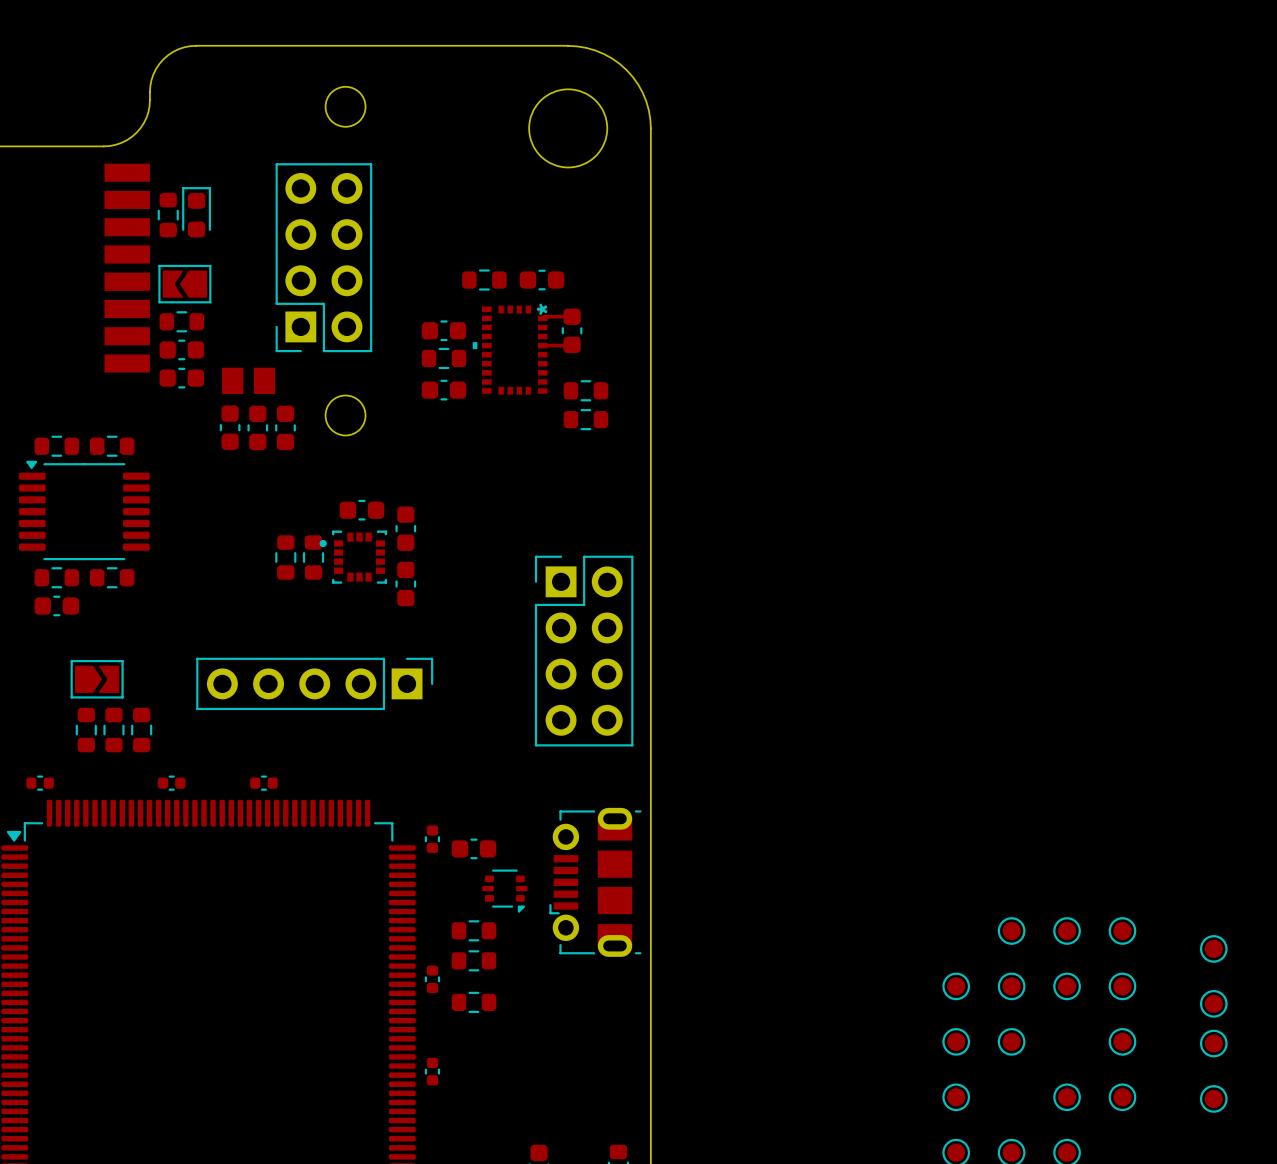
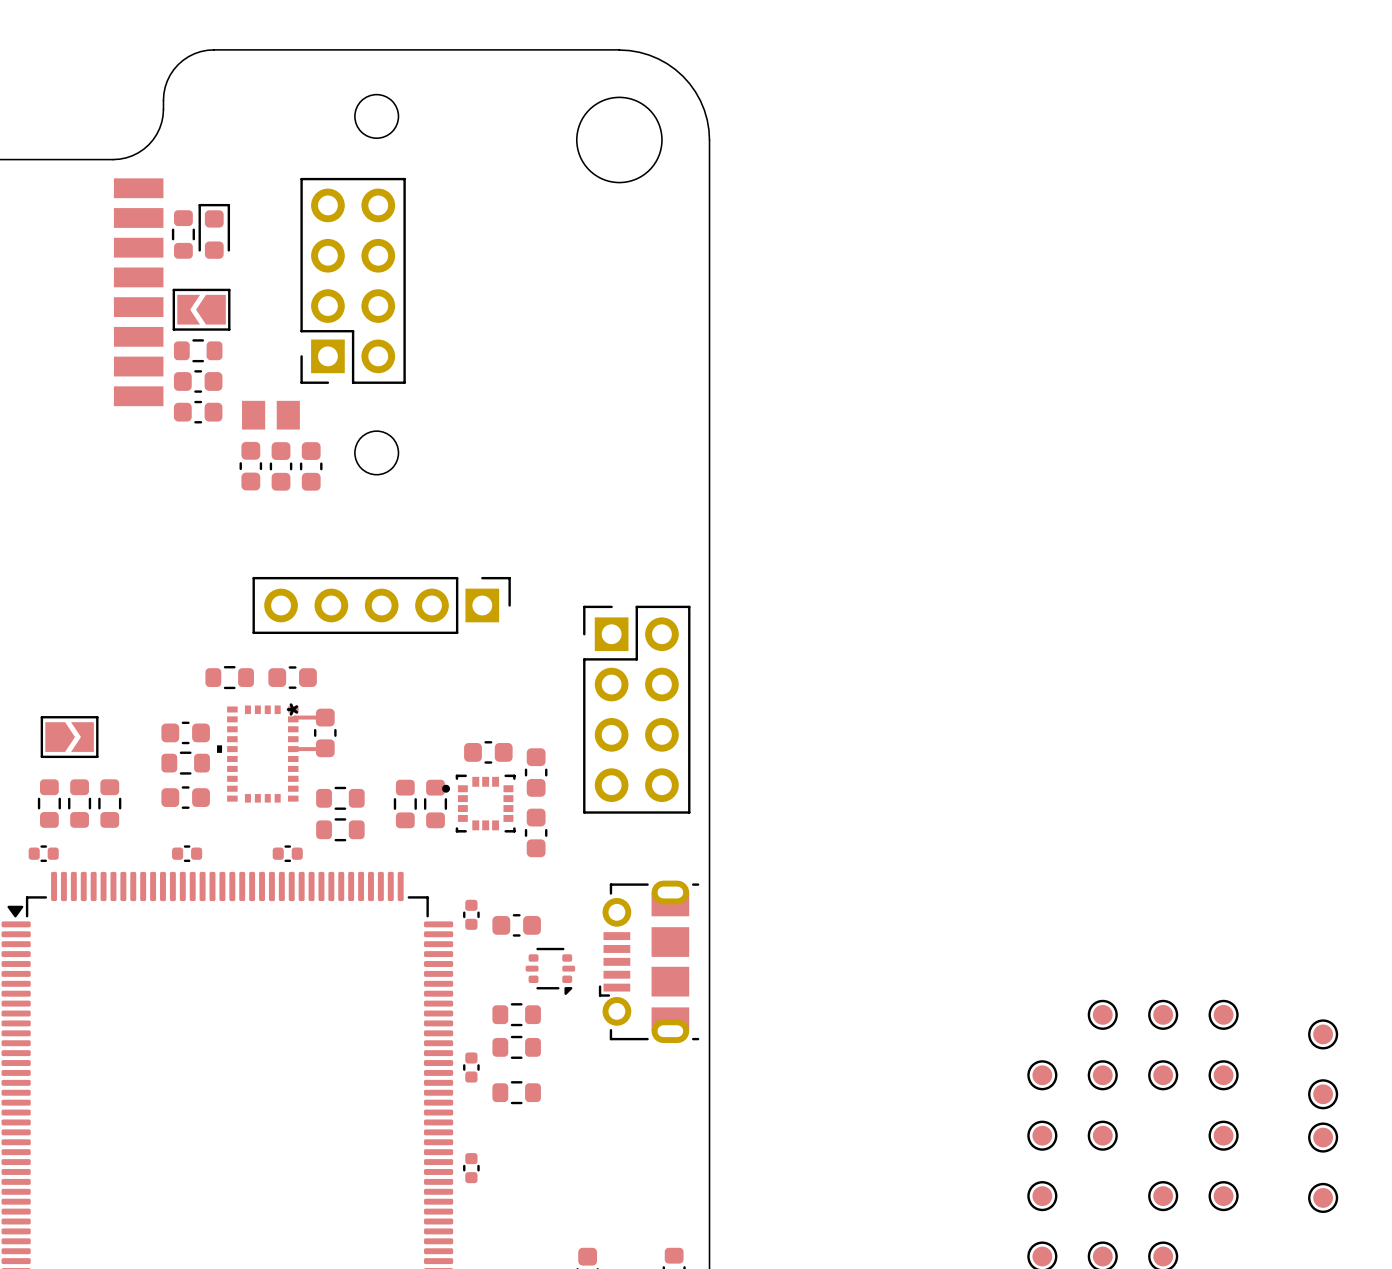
part: (484, 280) -> none
part: (542, 280) -> none
track: (572, 316) (544, 316) (542, 318) -> (325, 717) (295, 717) (293, 719)
part: (443, 330) -> none
part: (572, 330) -> none
track: (572, 344) (542, 345) -> (325, 748) (293, 749)
part position: (510, 350) -> (257, 754)
part: (443, 358) -> none
part: (443, 390) -> none
part: (585, 390) -> none
part: (585, 419) -> none
part: (56, 446) -> none
part: (112, 446) -> none
part: (84, 510) -> none
part: (361, 510) -> none
part: (405, 528) -> none
part footprint: [319, 530, 388, 584] -> [252, 576, 511, 635]
part: (285, 557) -> none
part: (313, 557) -> none
part: (56, 577) -> none
part: (112, 577) -> none
part: (405, 584) -> none
part: (56, 605) -> none
part: none -> (229, 677)
part: none -> (292, 677)
part: none -> (185, 732)
part: none -> (325, 732)
part position: (97, 679) -> (69, 737)
part: (314, 683) -> none
part: none -> (488, 752)
part: none -> (185, 763)
part: none -> (536, 772)
part: (86, 730) -> none
part: (113, 730) -> none
part: (141, 730) -> none
part: none -> (185, 797)
part: none -> (340, 798)
part: none -> (49, 803)
part: none -> (79, 803)
part: none -> (109, 803)
part: none -> (405, 803)
part: none -> (435, 803)
part: none -> (478, 803)
part: none -> (340, 829)
part: none -> (536, 832)

